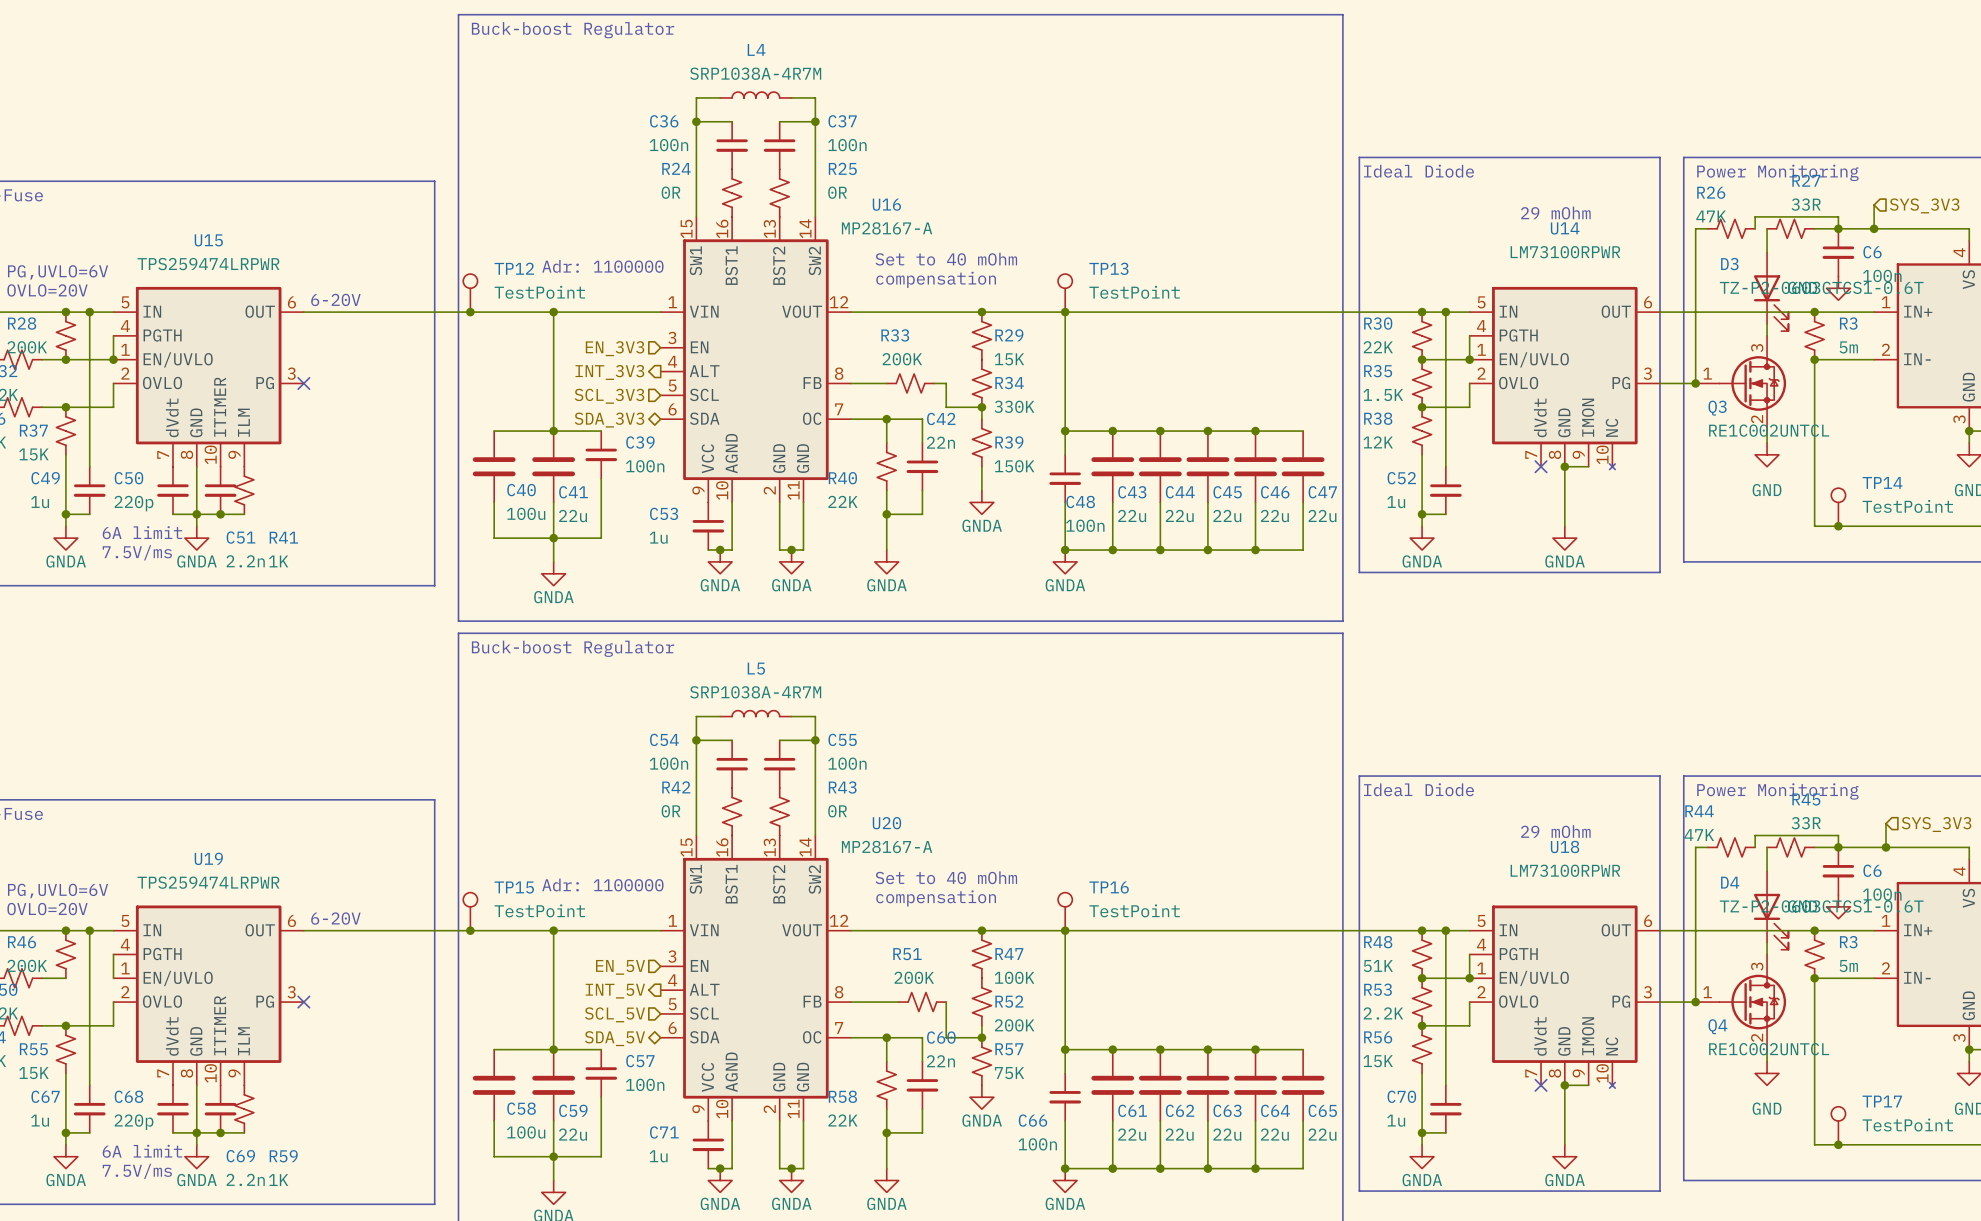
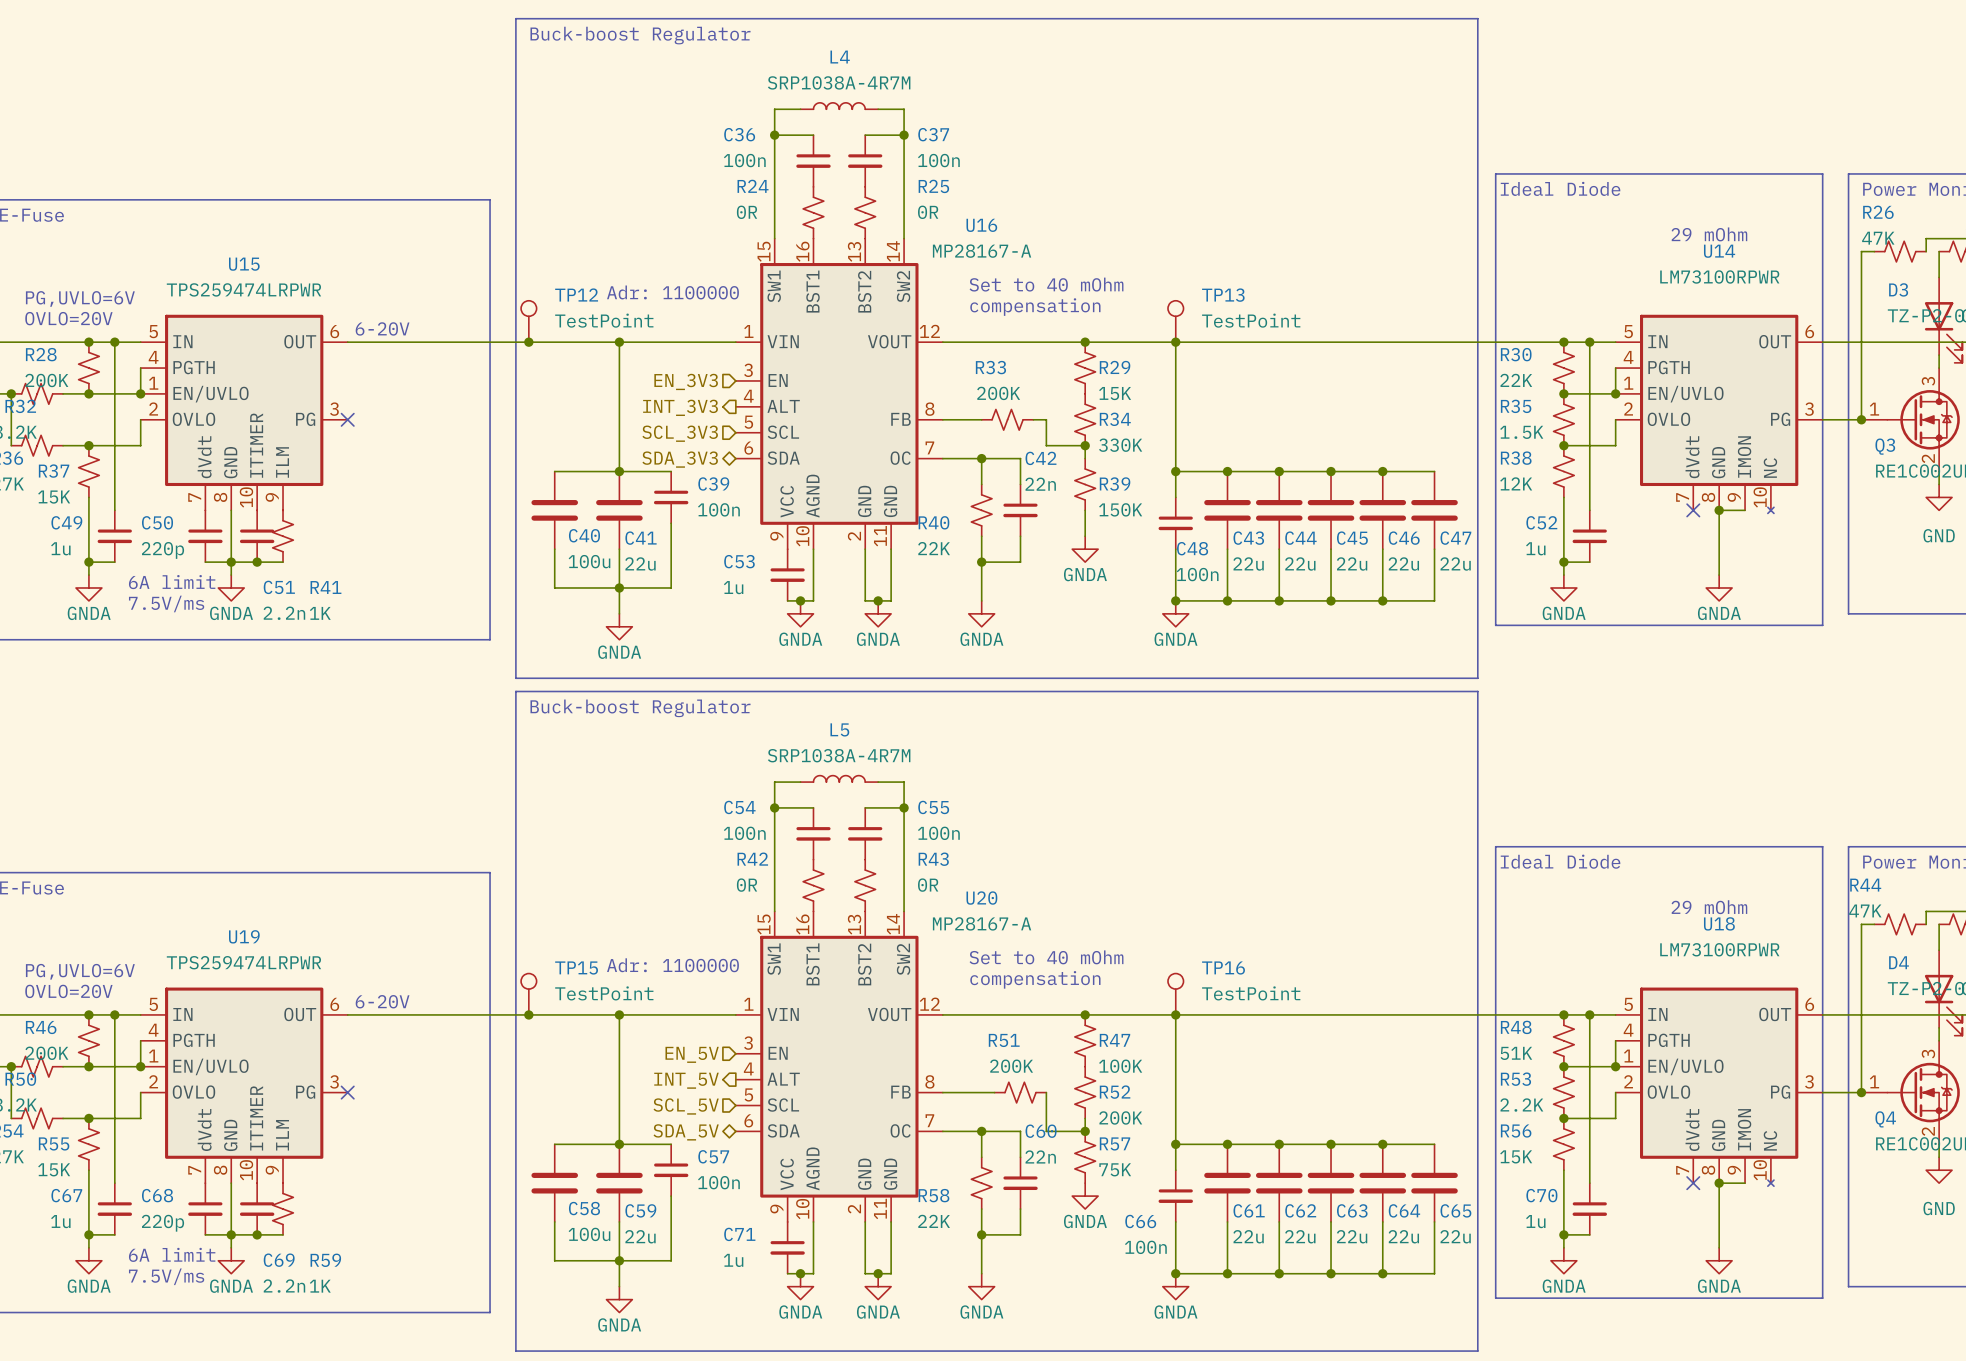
wire: none -> (88, 1066) (140, 1066)
junction: none -> (88, 1066)
junction: none -> (140, 1066)

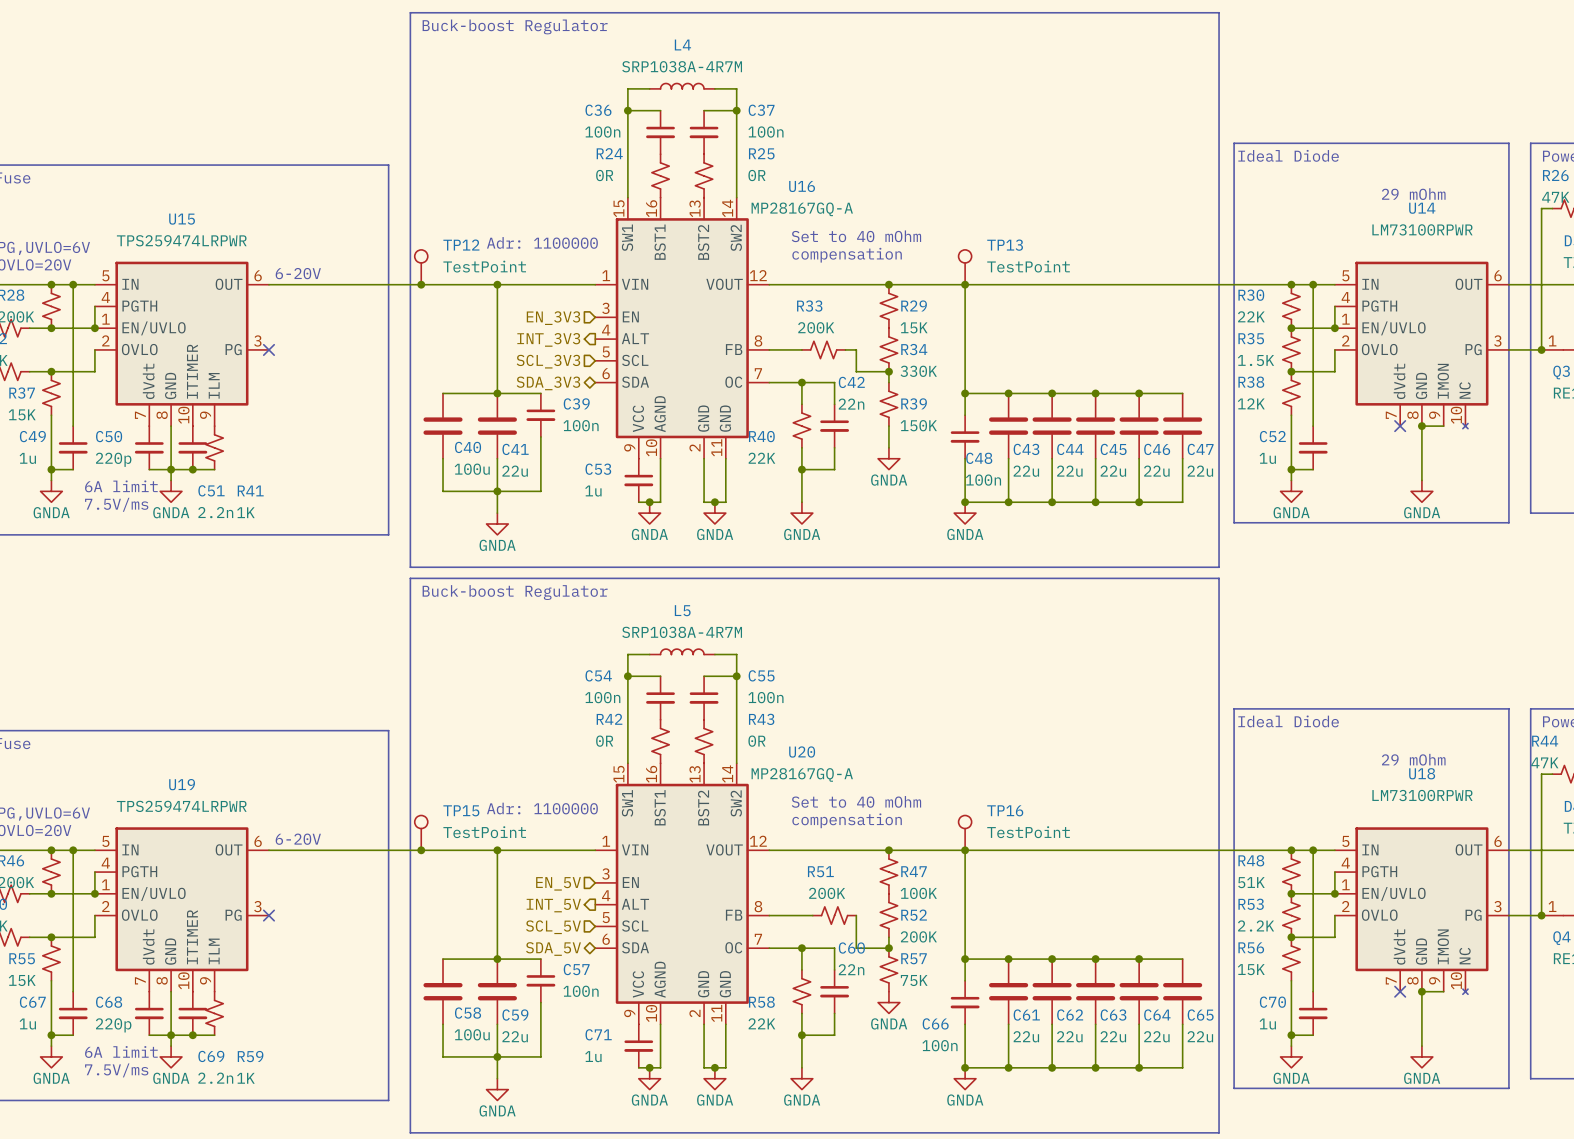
U16 value: MP28167-A (982, 251) -> MP28167GQ-A (802, 209)
U20 value: MP28167-A (982, 923) -> MP28167GQ-A (802, 774)

